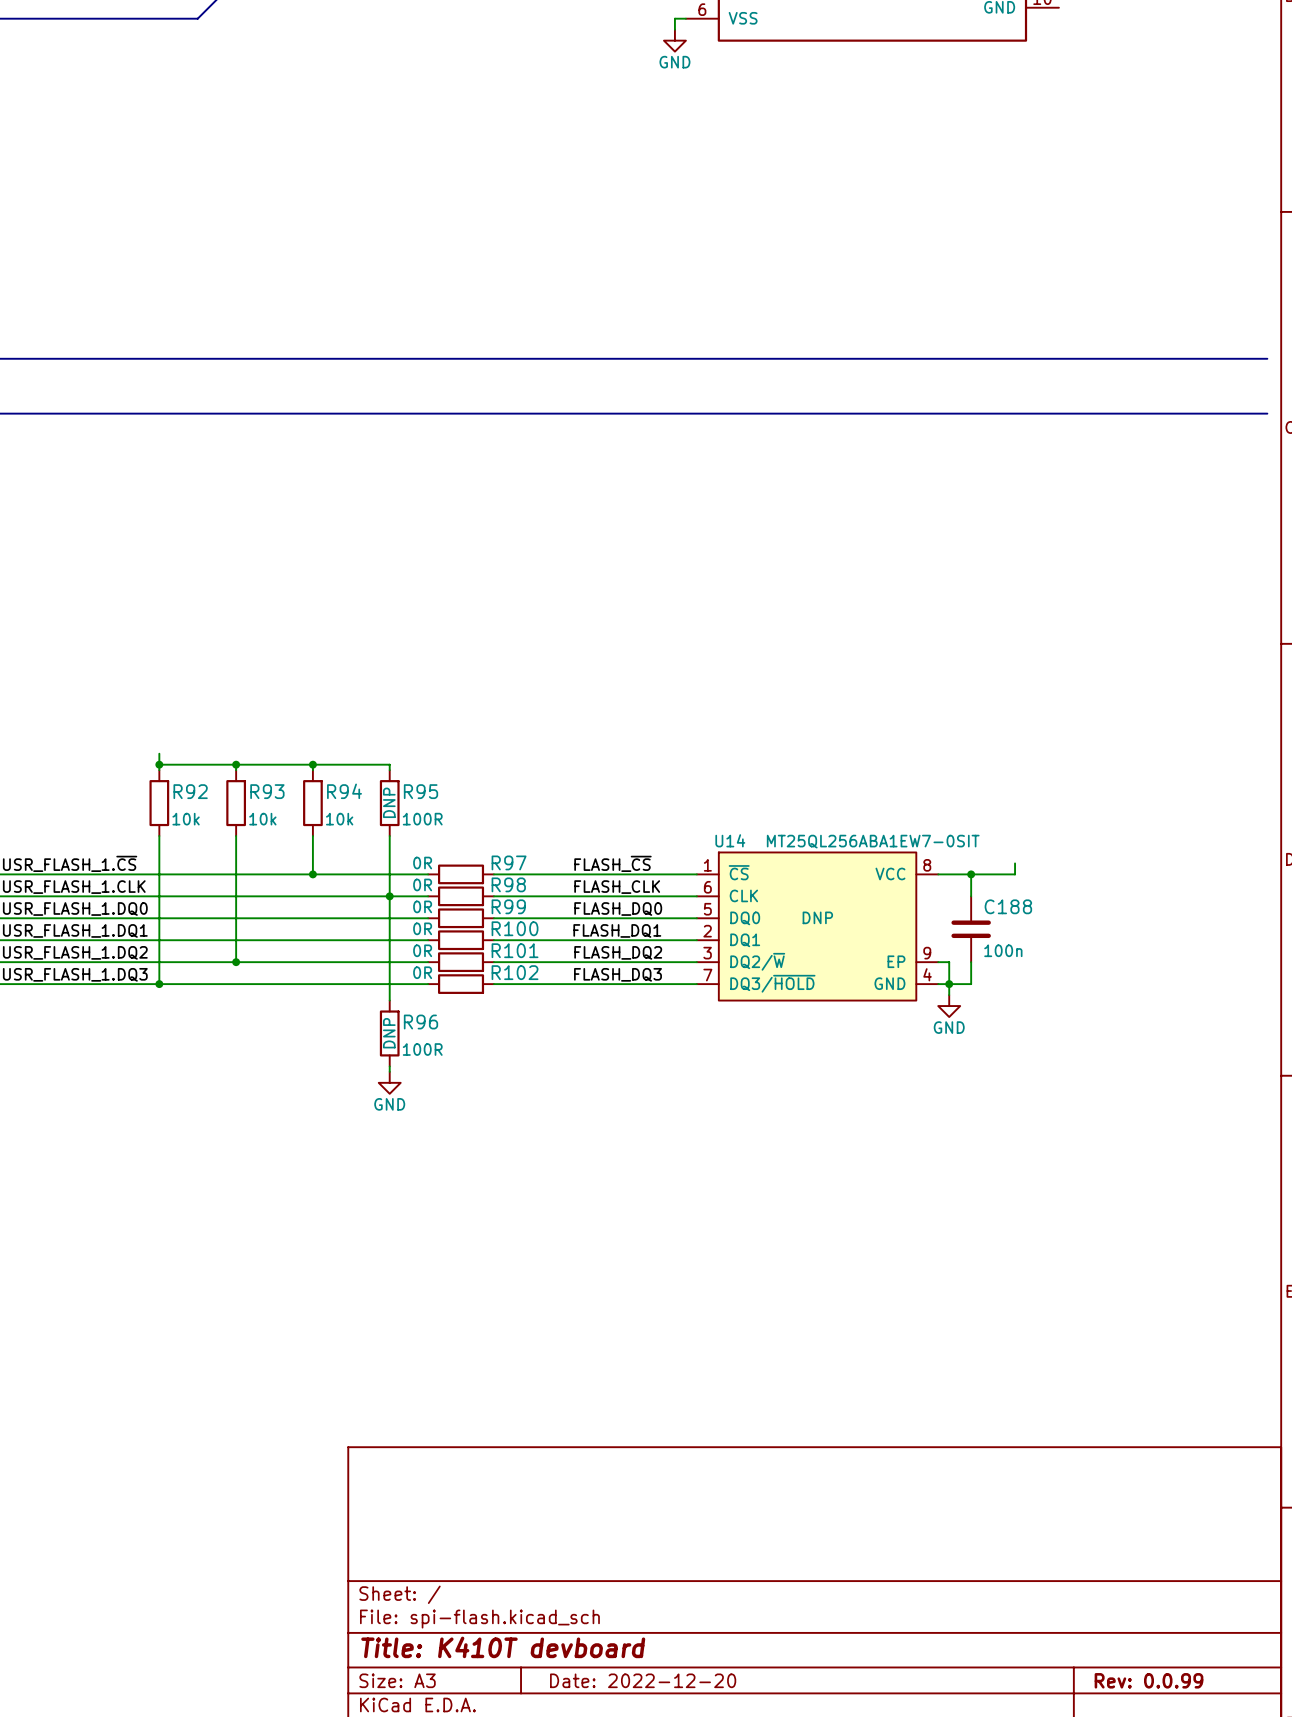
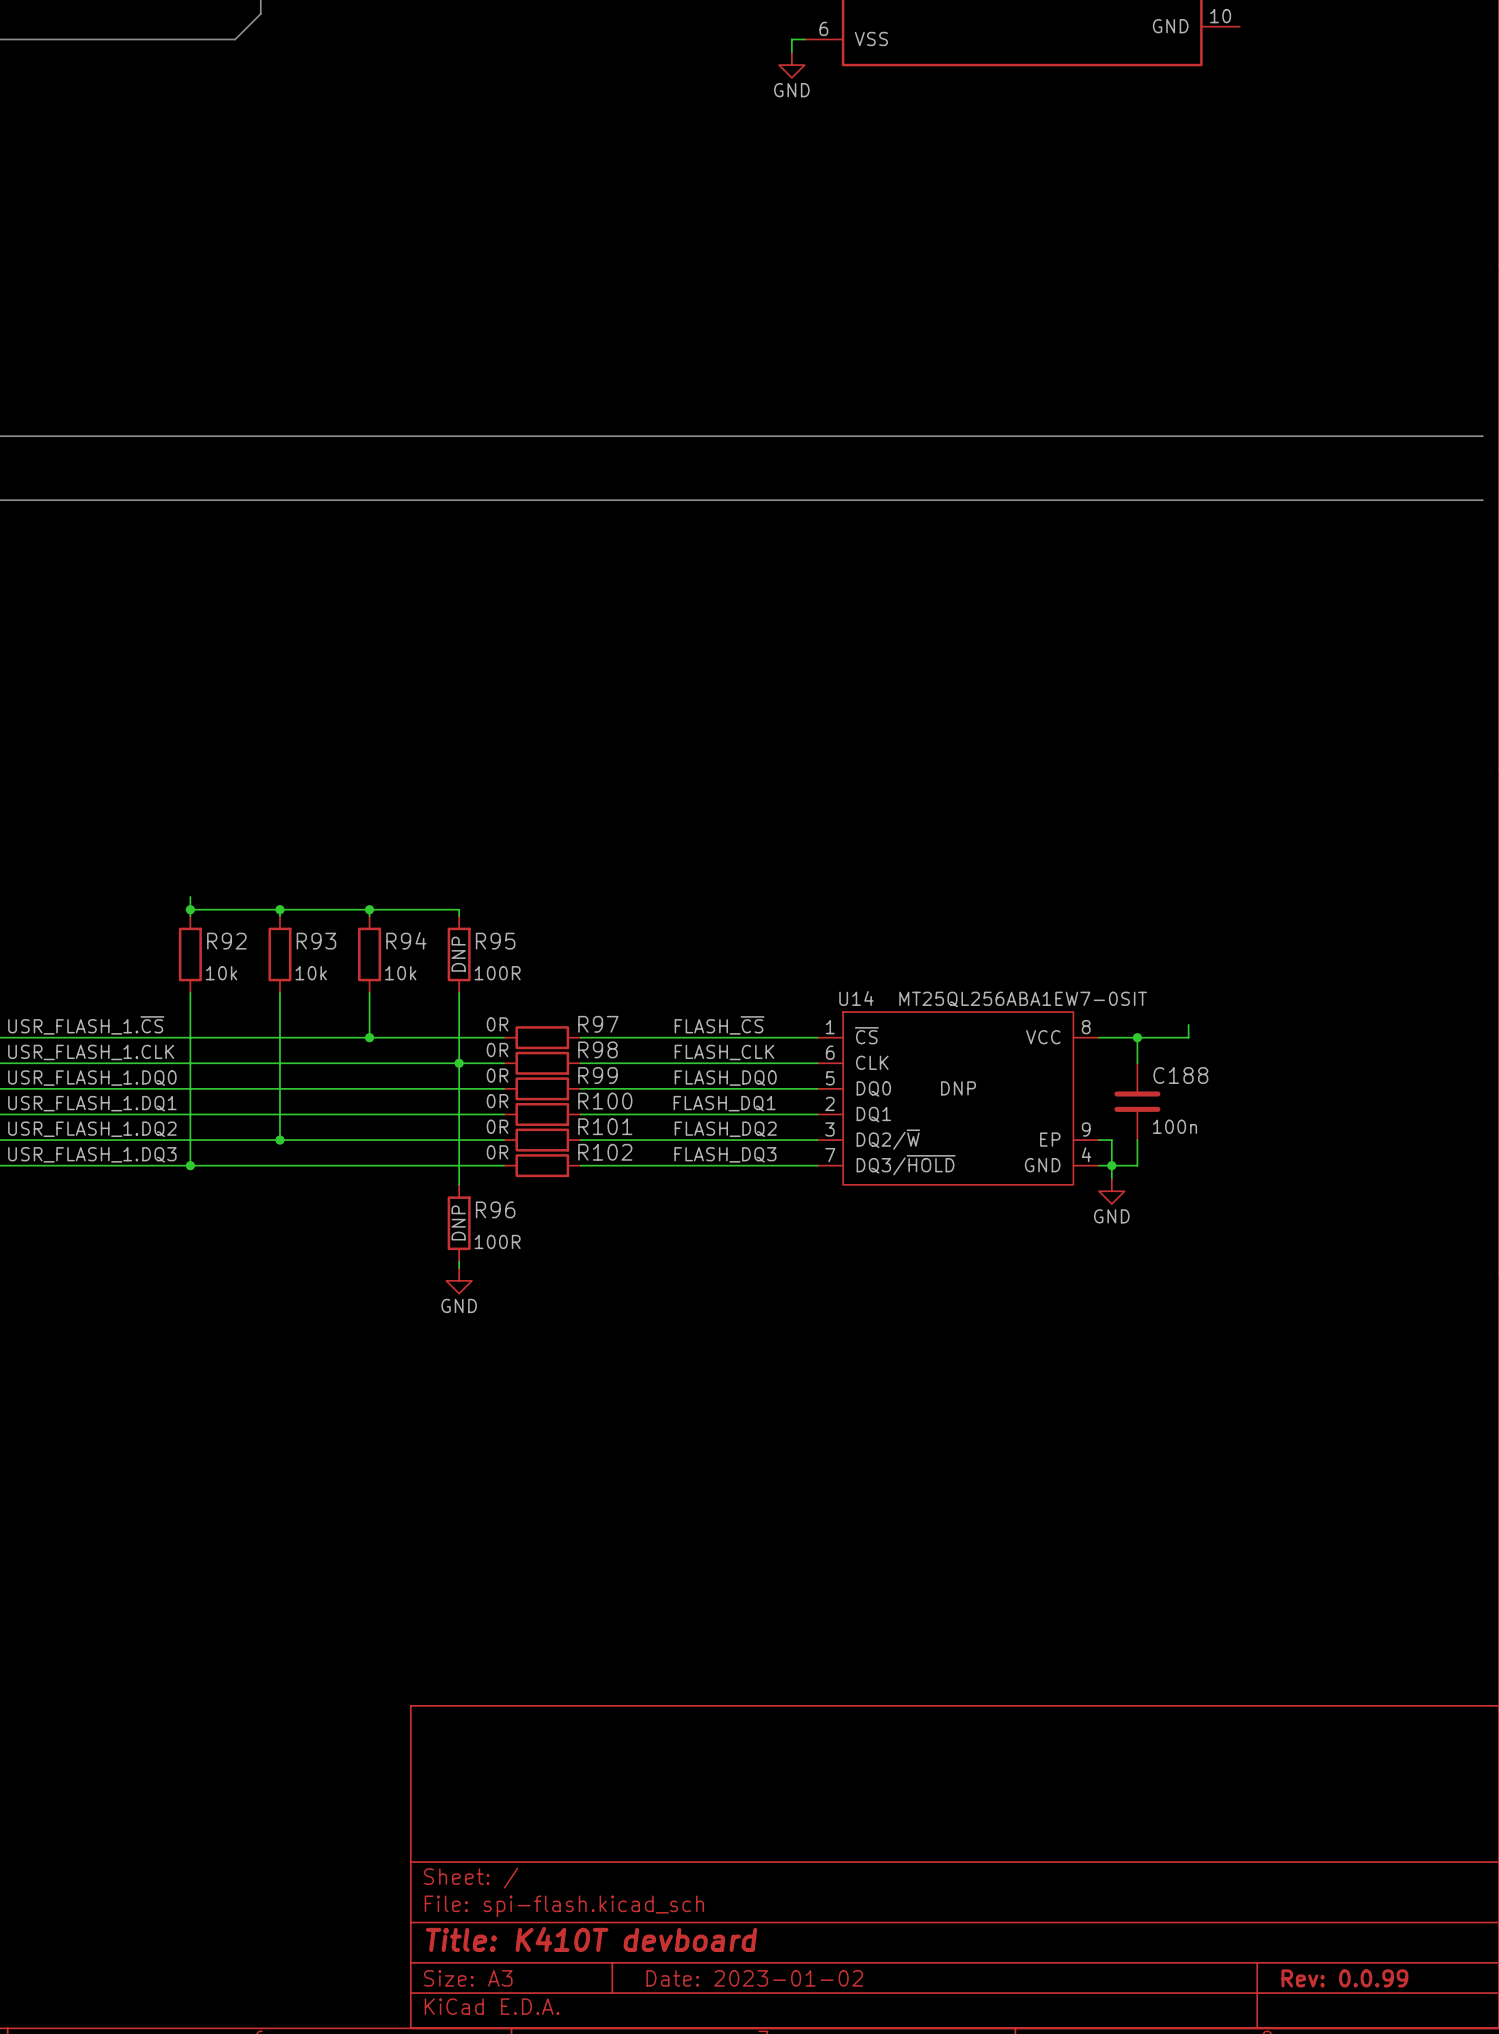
title block: Date: 2022-12-20 (643, 1680) -> Date: 2023-01-02 (754, 1978)

